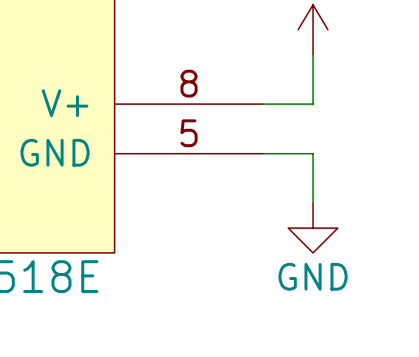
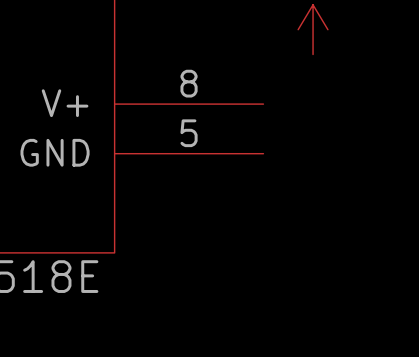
wire: (313, 54) (313, 104) (263, 104) -> none
wire: (263, 153) (313, 153) (313, 203) -> none
power symbol: GND (313, 228) -> none

